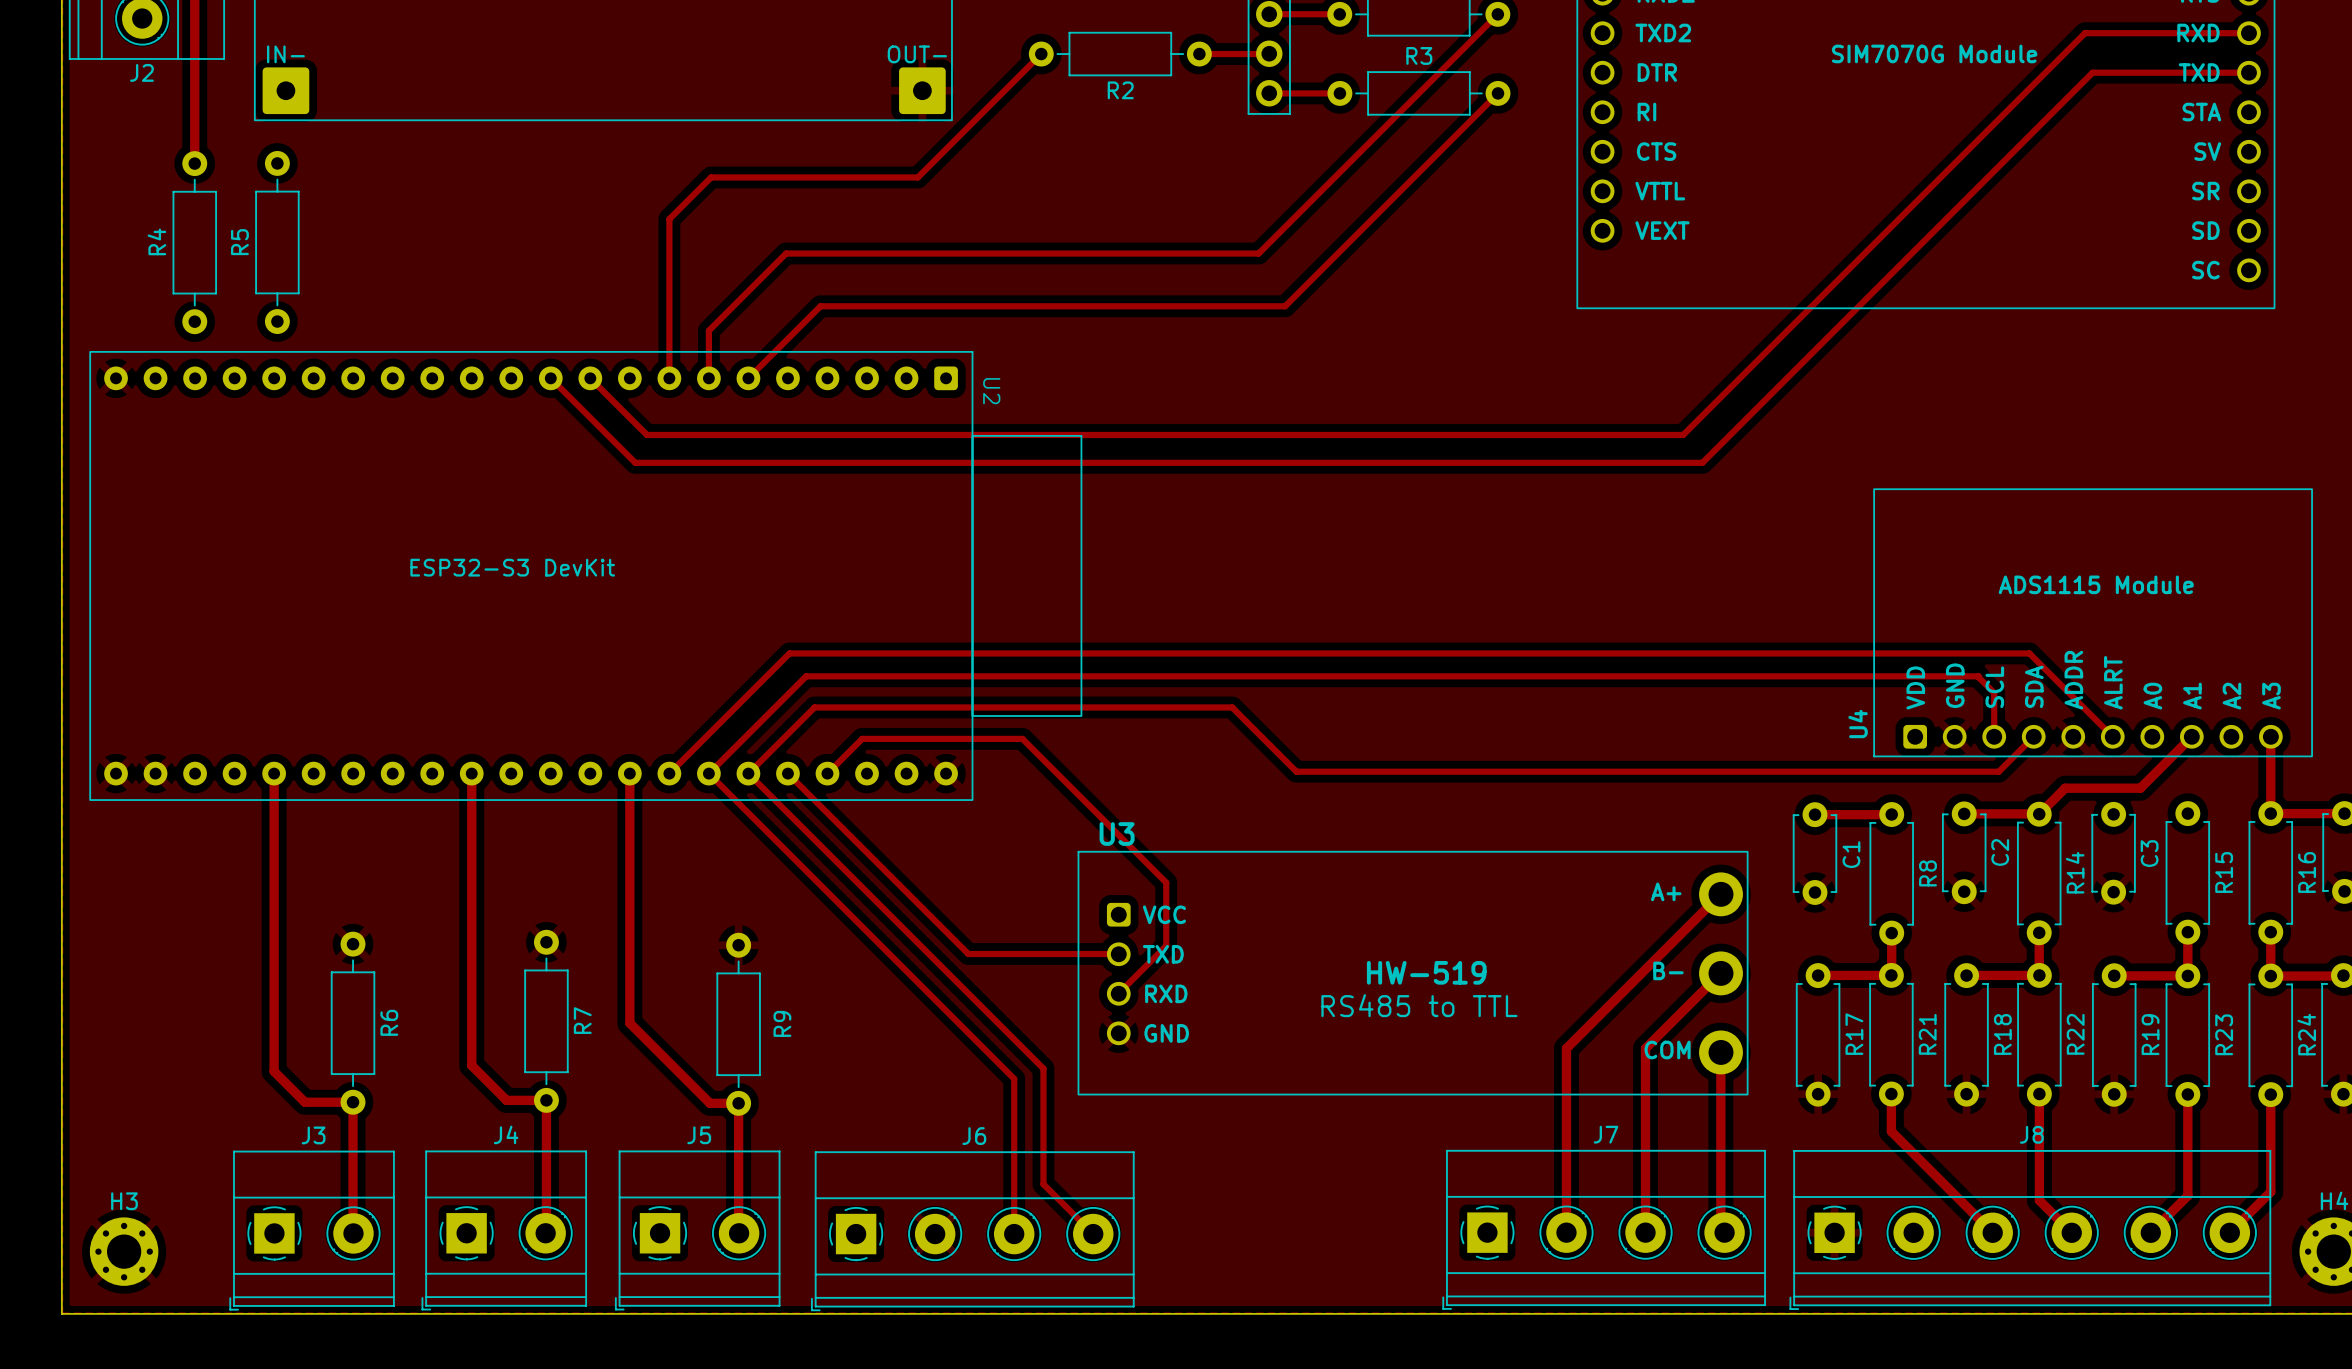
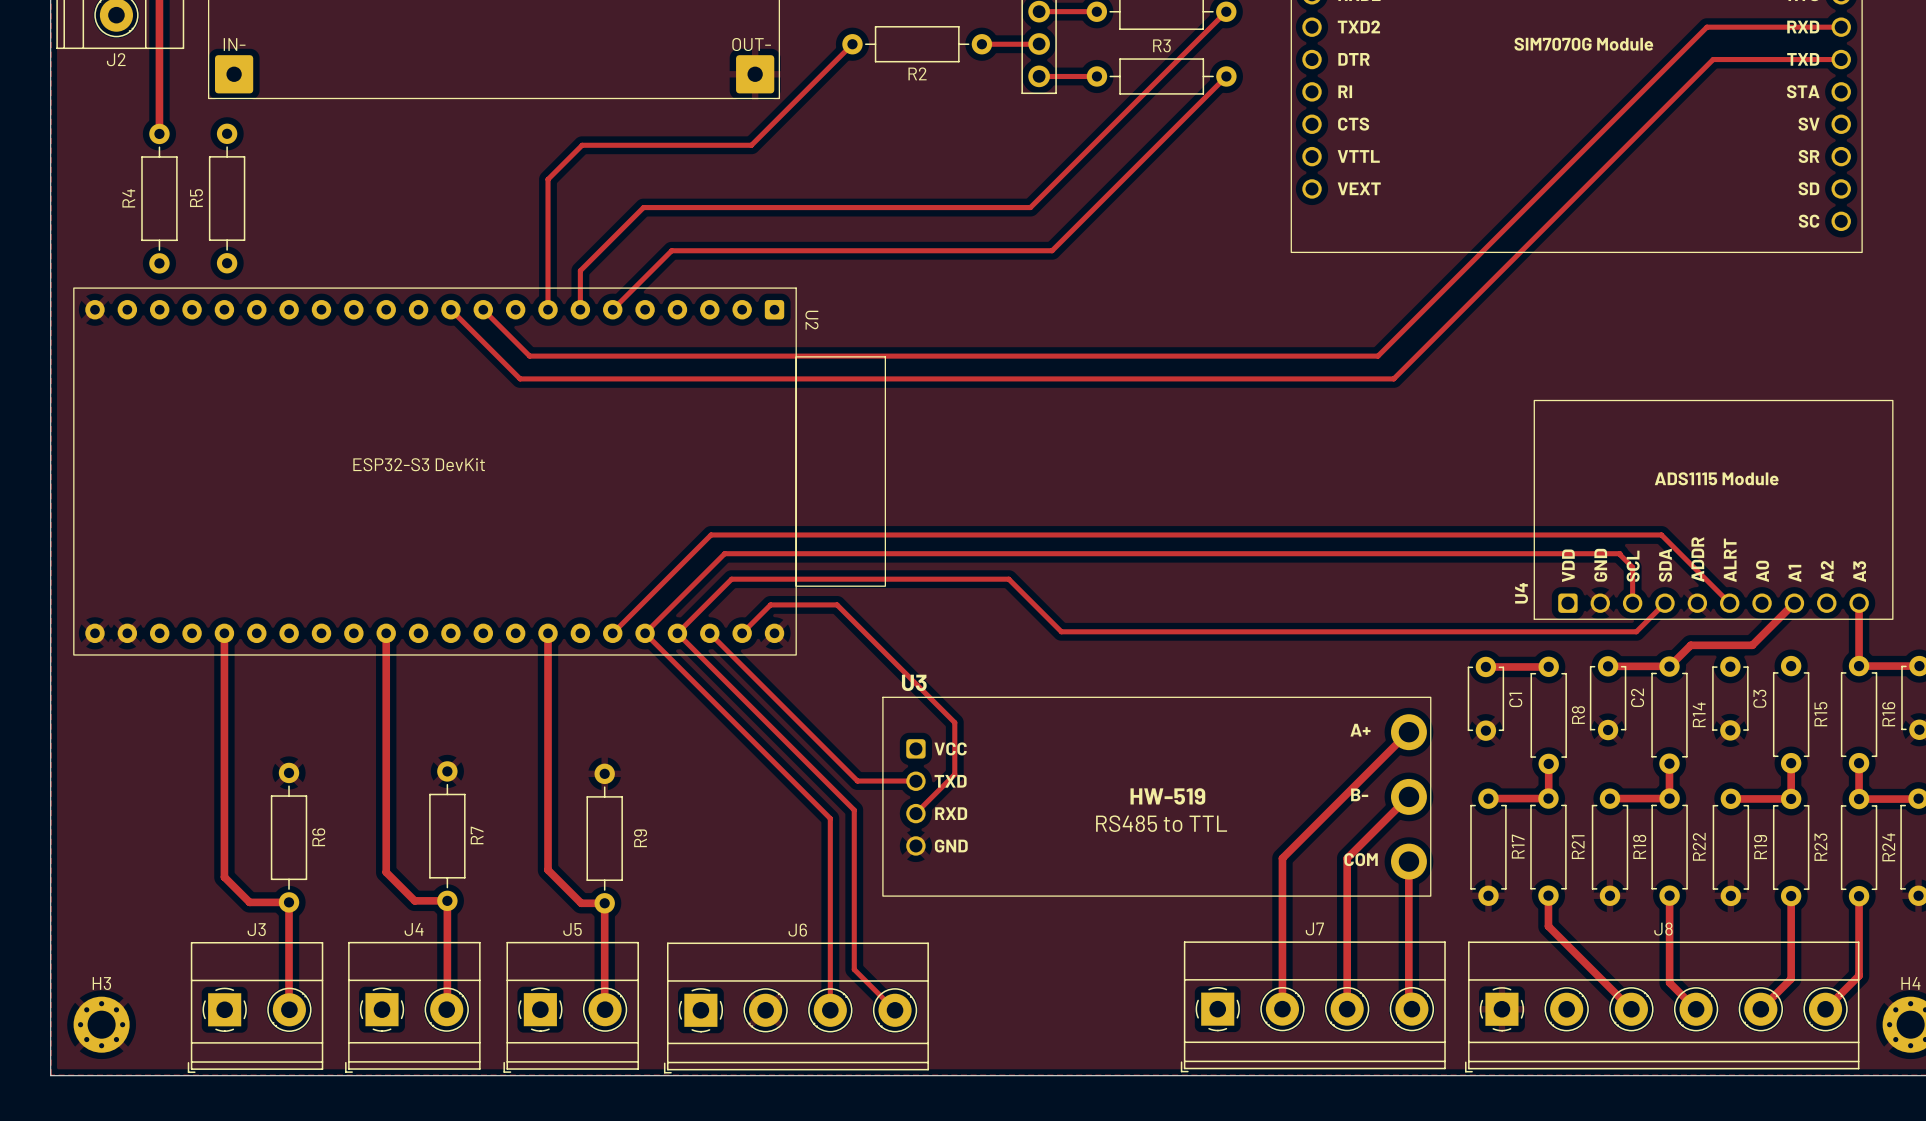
track: (868, 653) (789, 653) (669, 773) -> (711, 534) (666, 579)
track: (885, 676) (806, 676) (708, 773) (1014, 1078) -> (724, 553) (645, 633)
track: (814, 707) (893, 707) -> (705, 604) (731, 579)
track: (862, 738) (941, 738) -> (742, 633) (770, 604)
track: (629, 773) (629, 1023) (669, 1062) -> (548, 633) (548, 870)
track: (748, 773) (1043, 1068) -> (677, 633) (854, 810) (854, 874)
track: none -> (709, 633) (857, 781)
track: (968, 954) (1047, 954) -> (792, 781) (830, 818) (830, 883)

